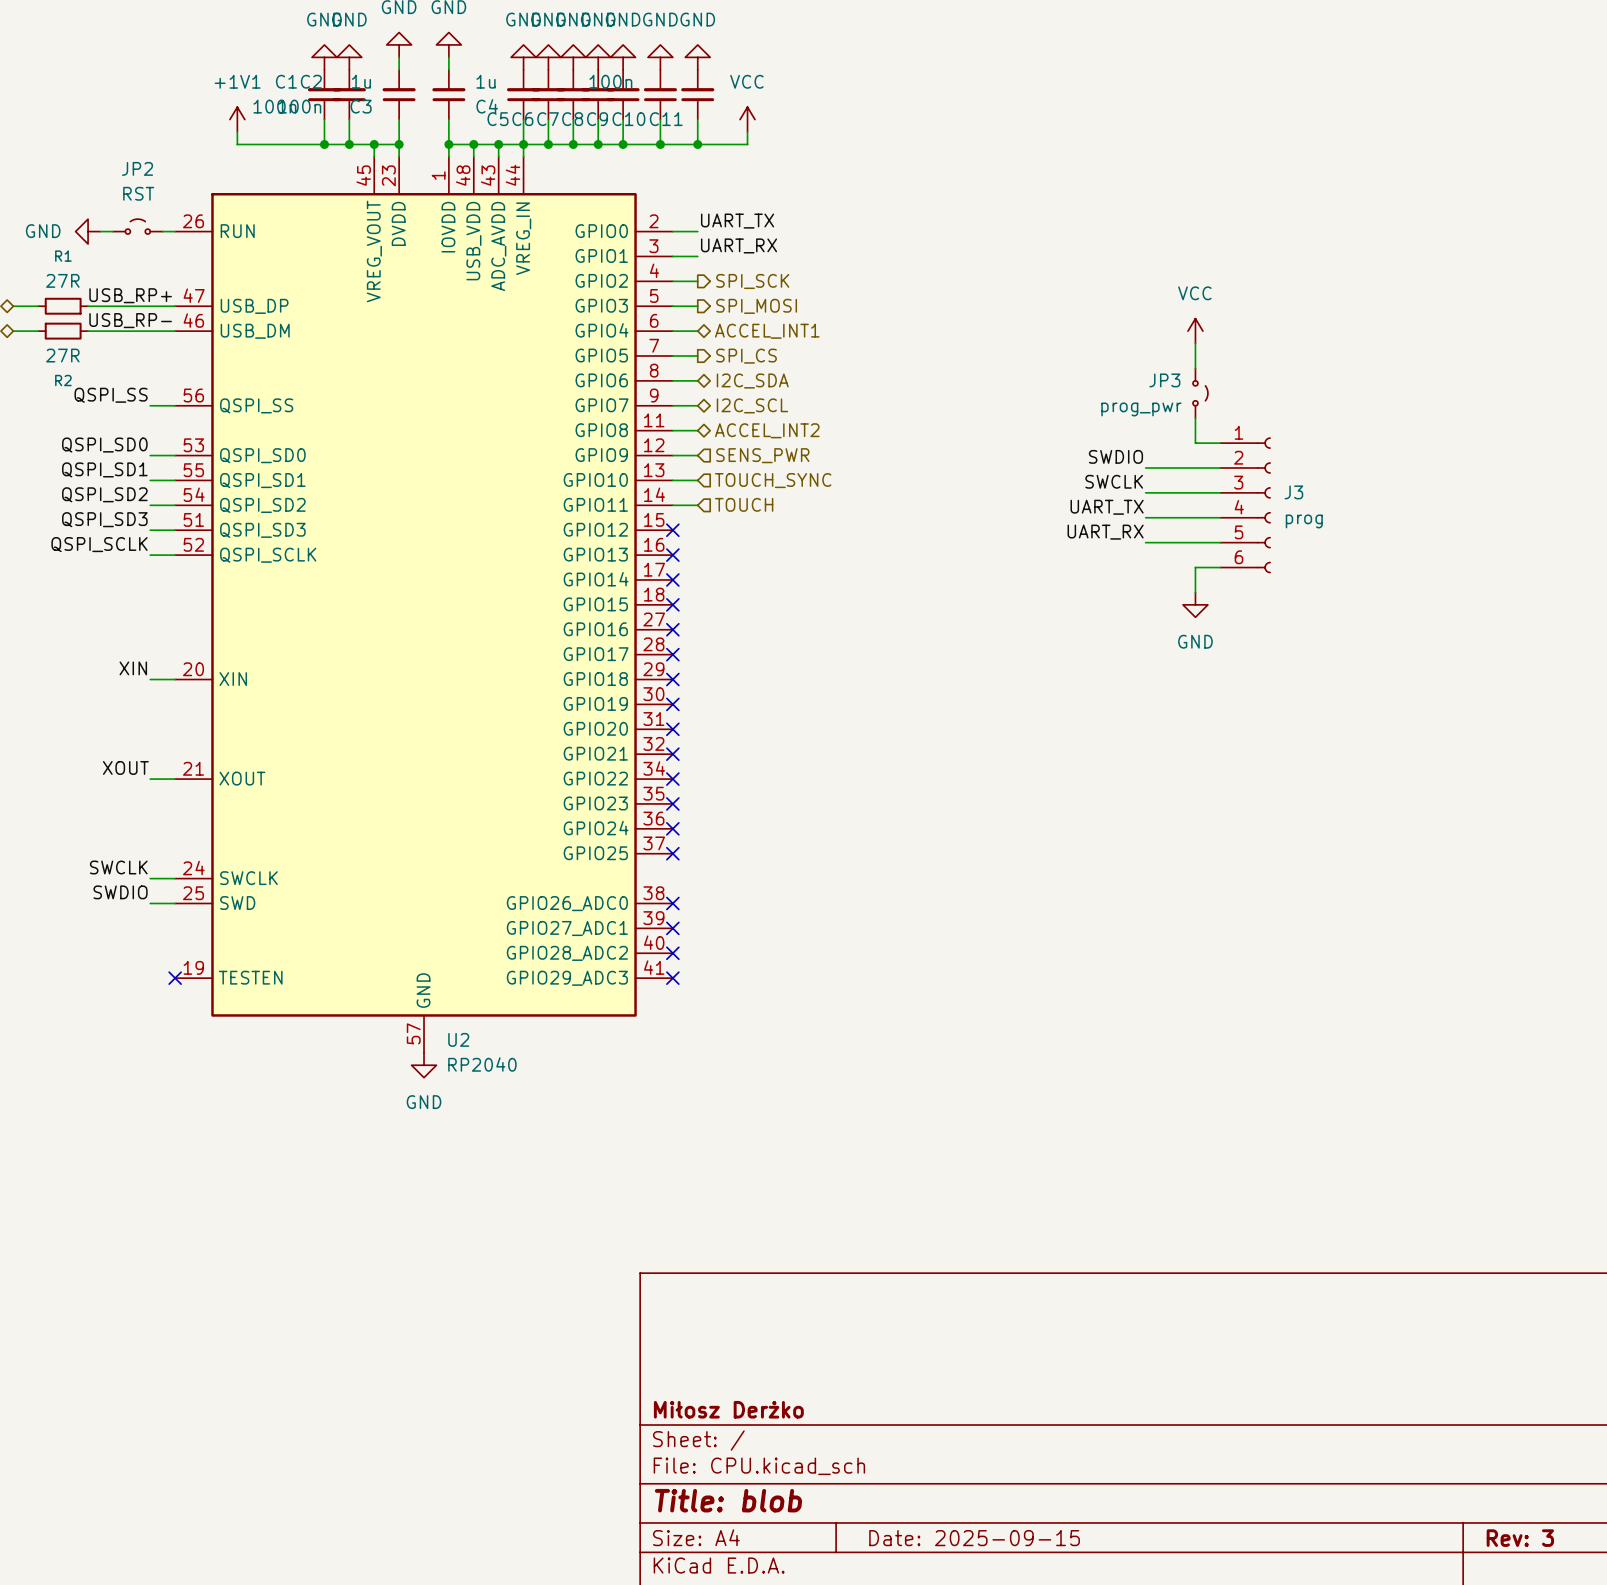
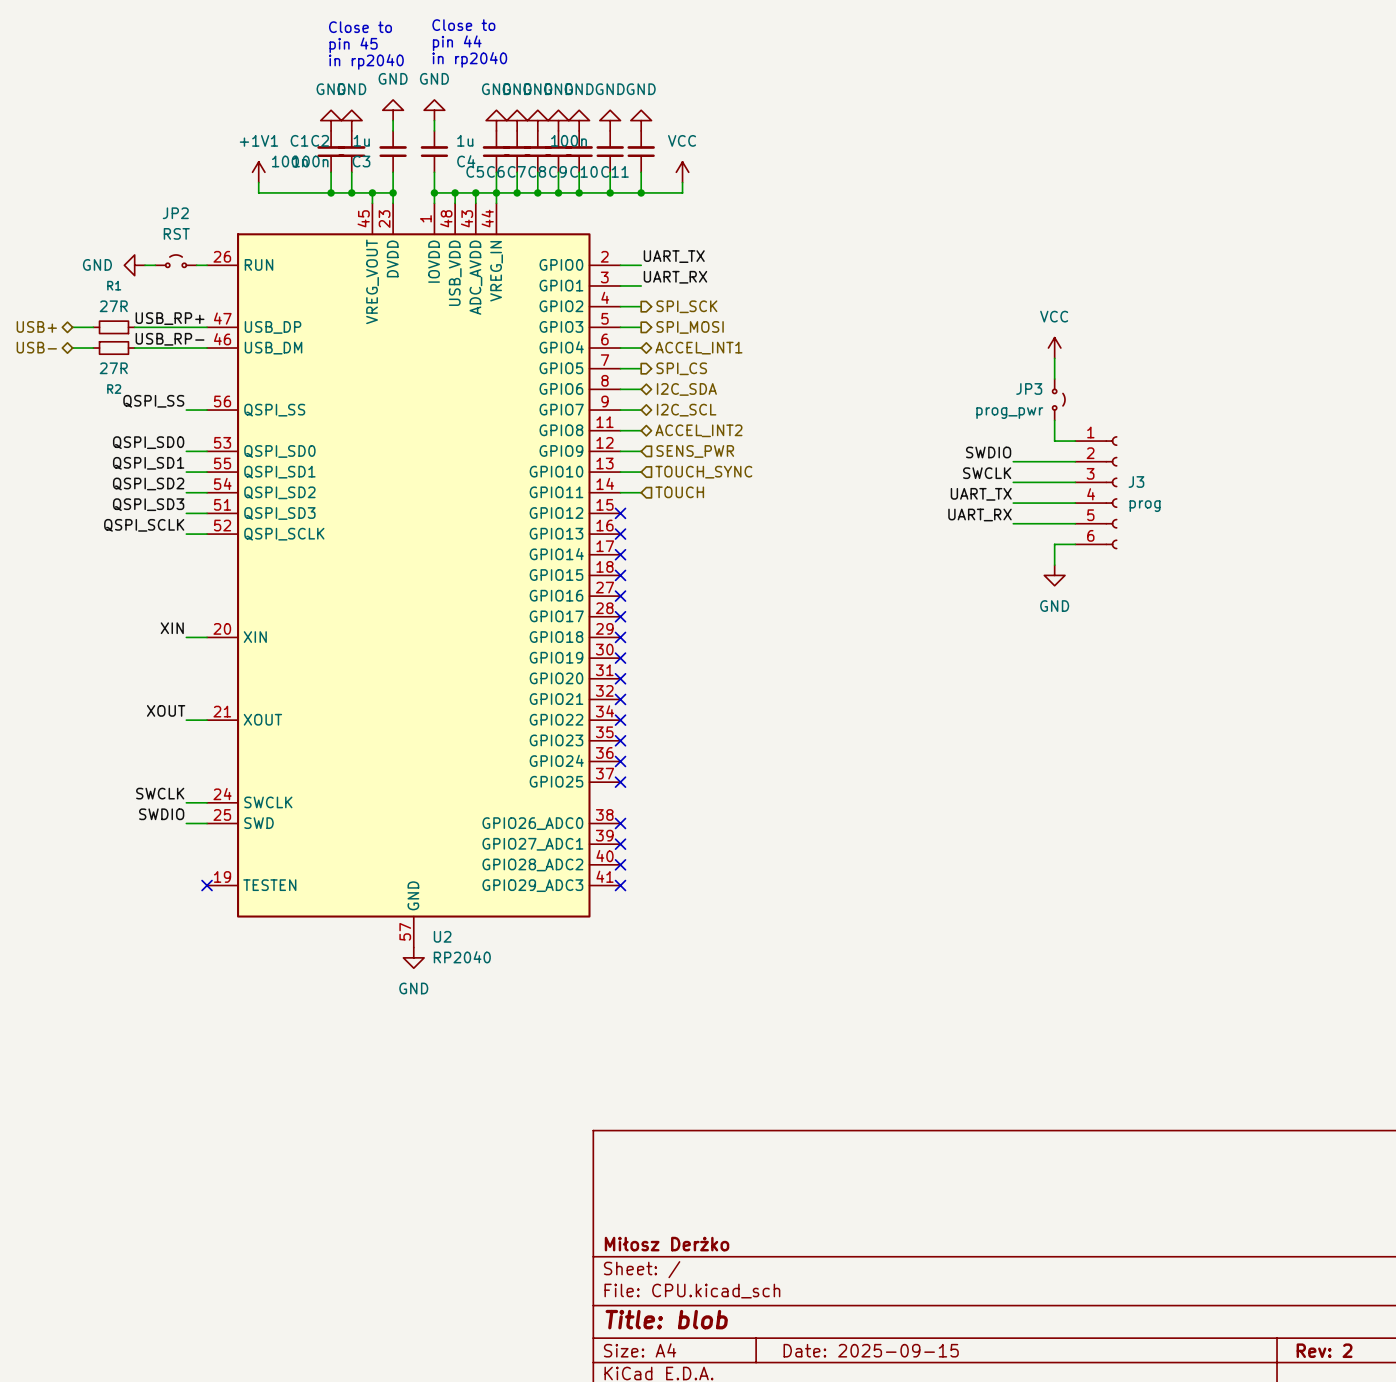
title block: Rev: 3 (1520, 1538) -> Rev: 2 (1324, 1350)

